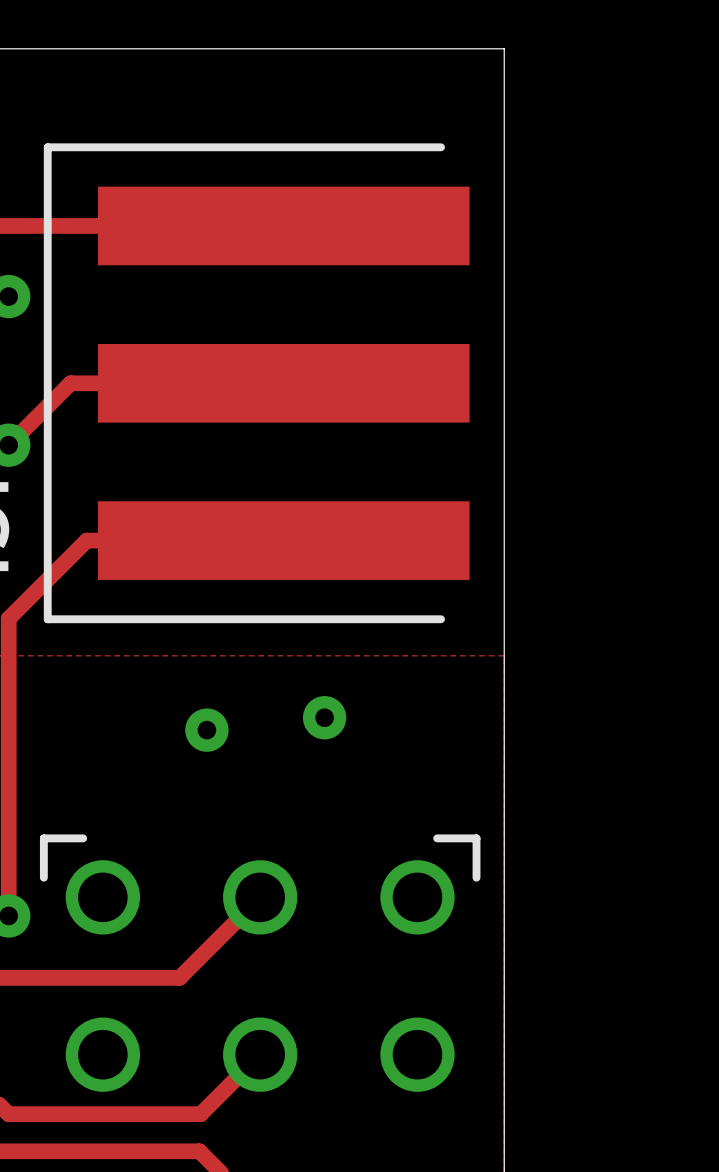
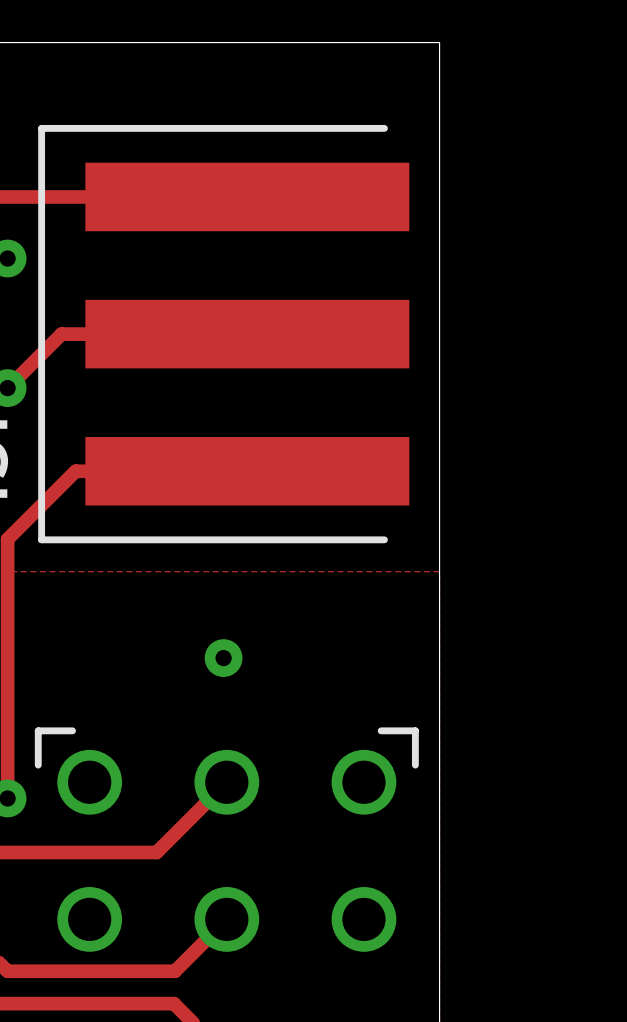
via: (324, 717) -> none
via: (206, 730) -> none
via: none -> (223, 658)

